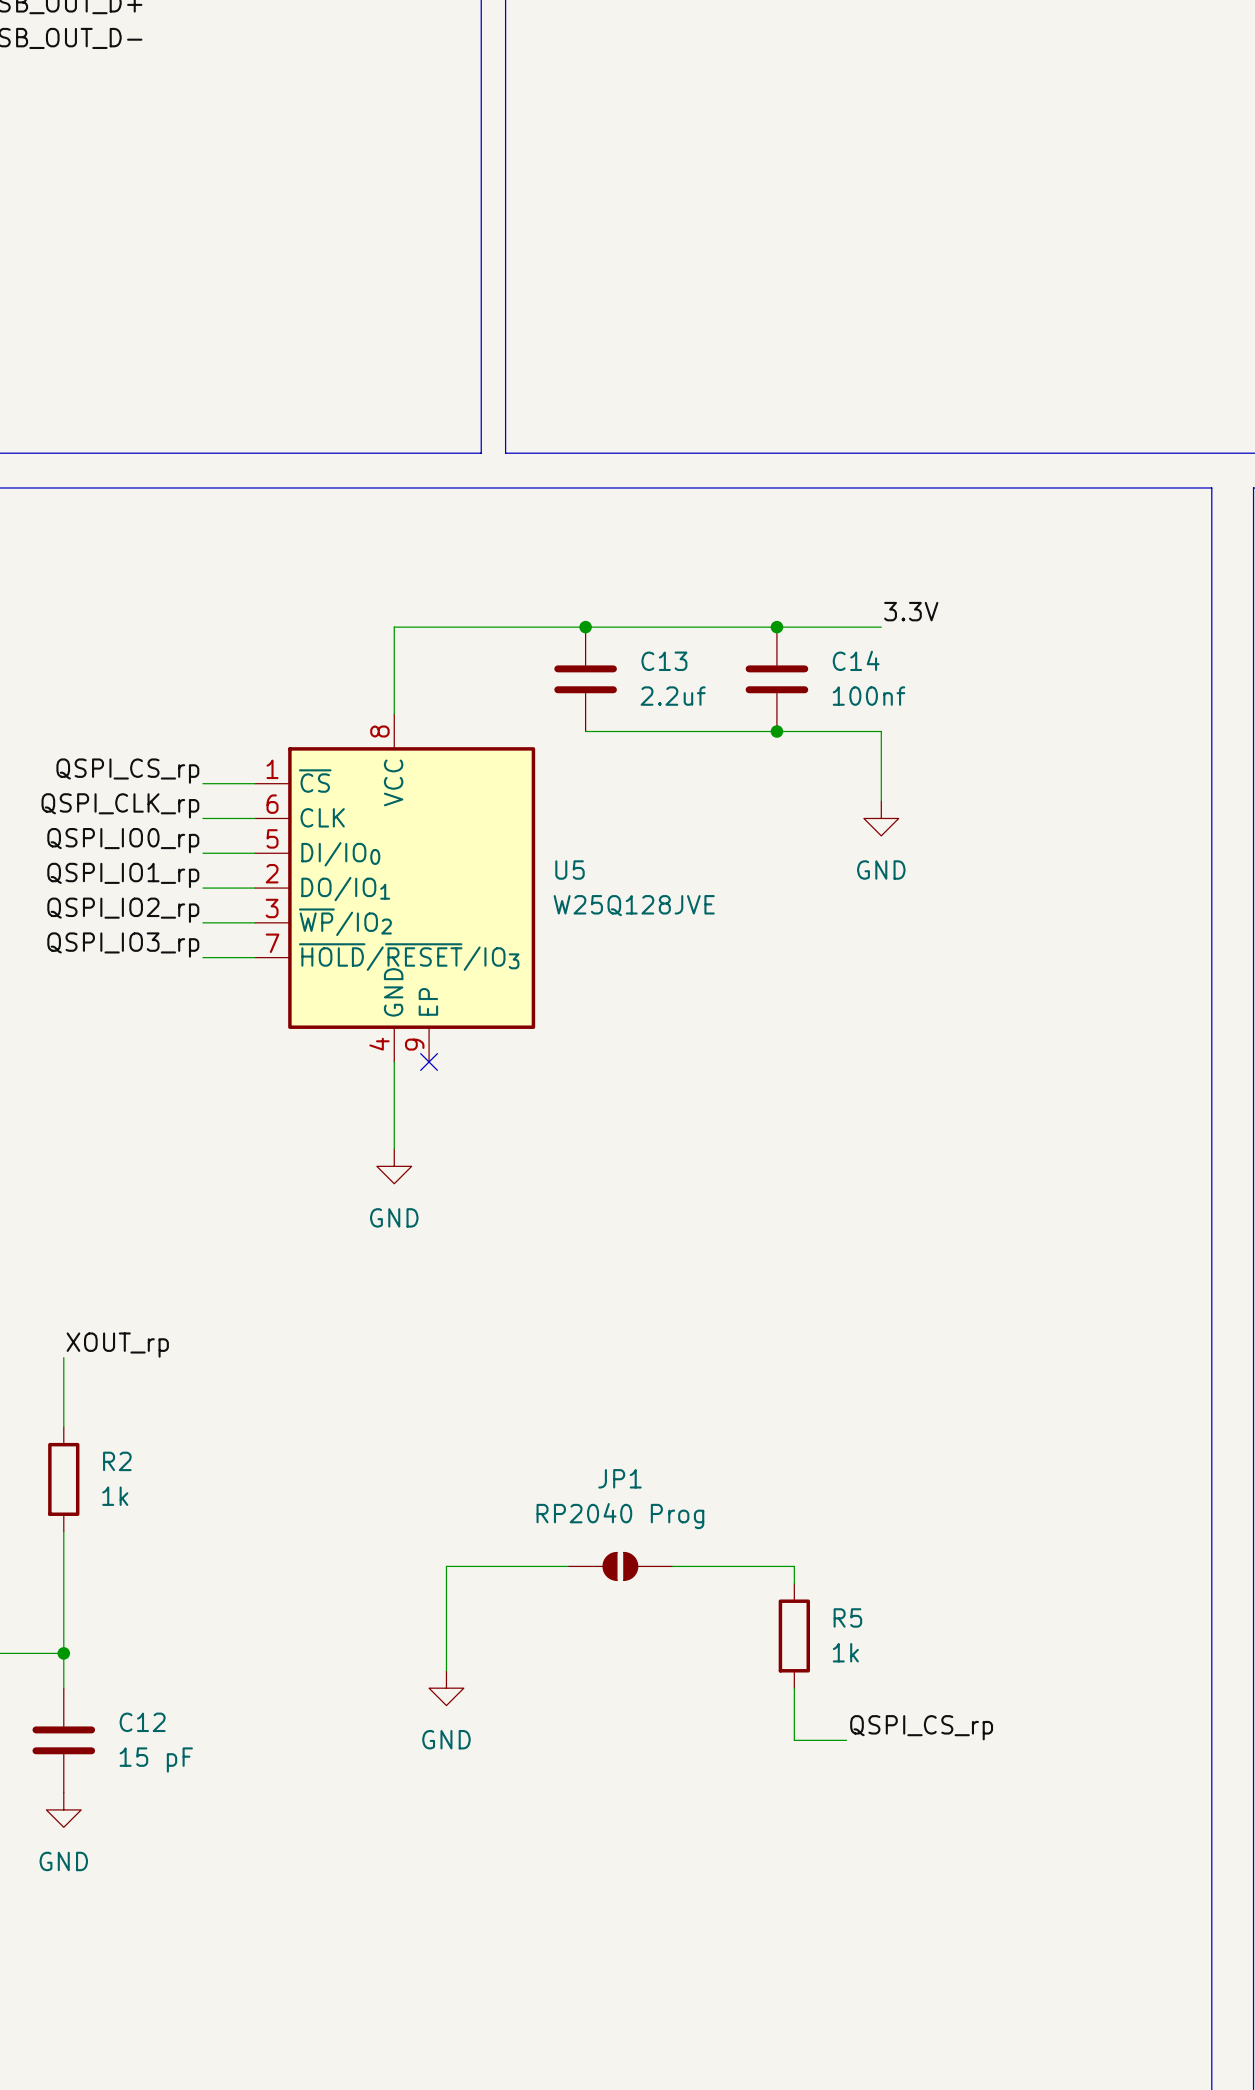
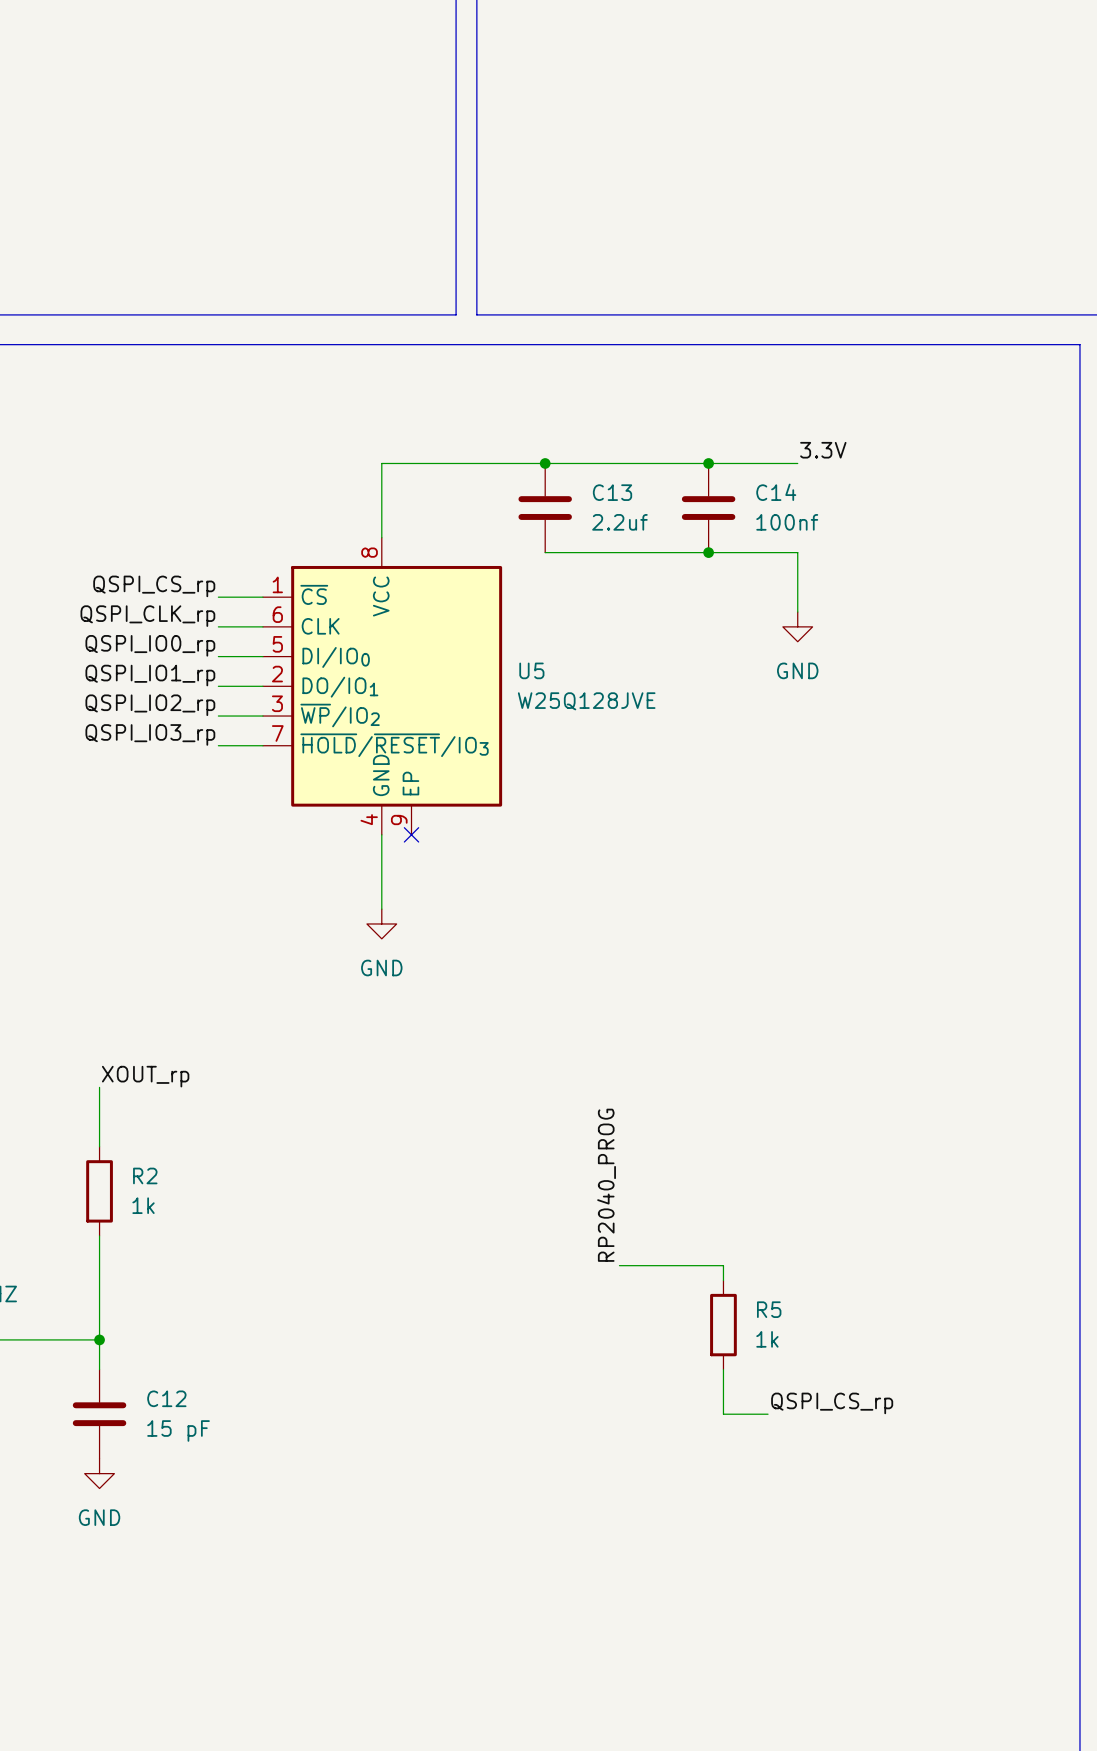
label: none -> RP2040_PROG (606, 1185)
wire: (568, 1566) (446, 1566) (446, 1670) -> none
JP1: RP2040 Prog (620, 1566) -> none
power symbol: GND (446, 1688) -> none

